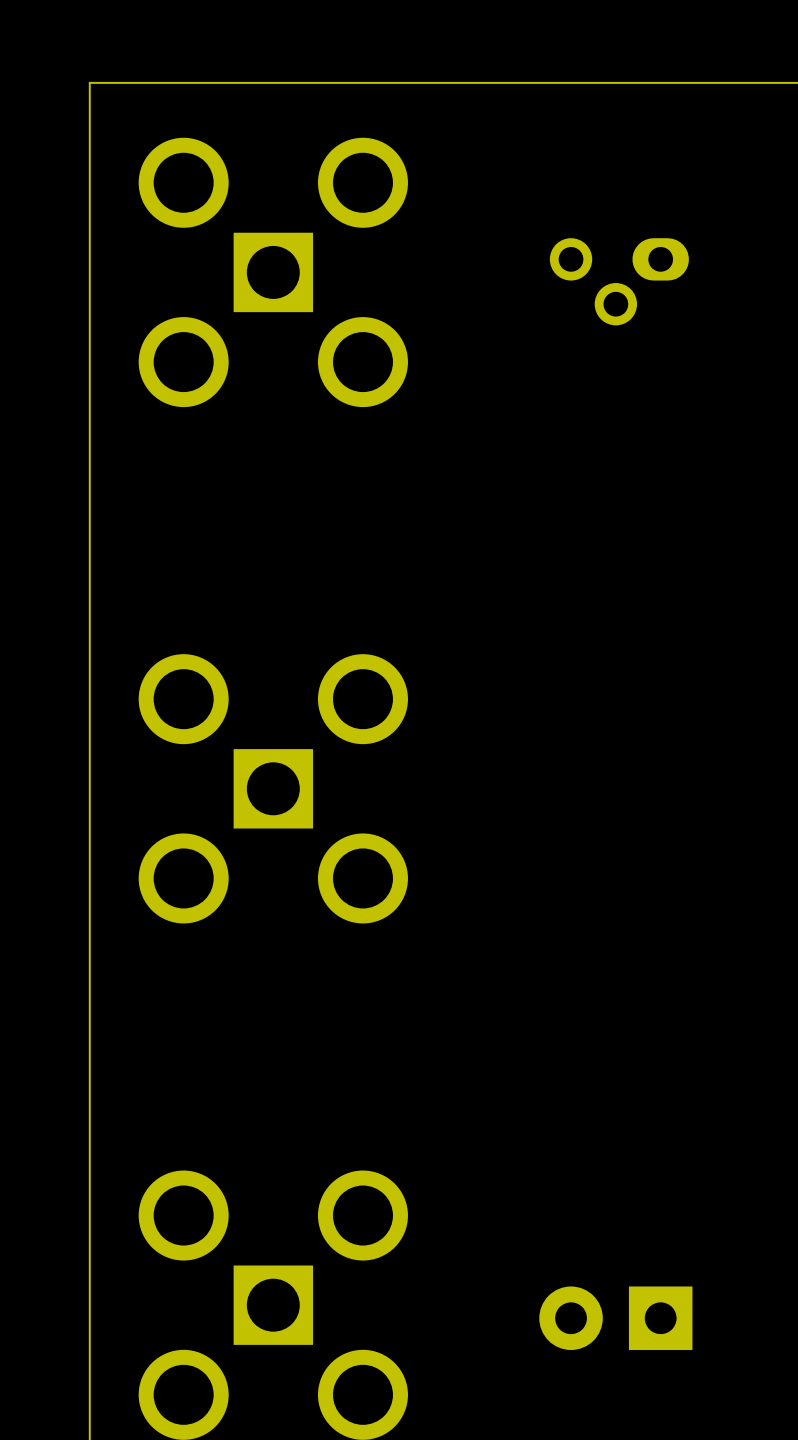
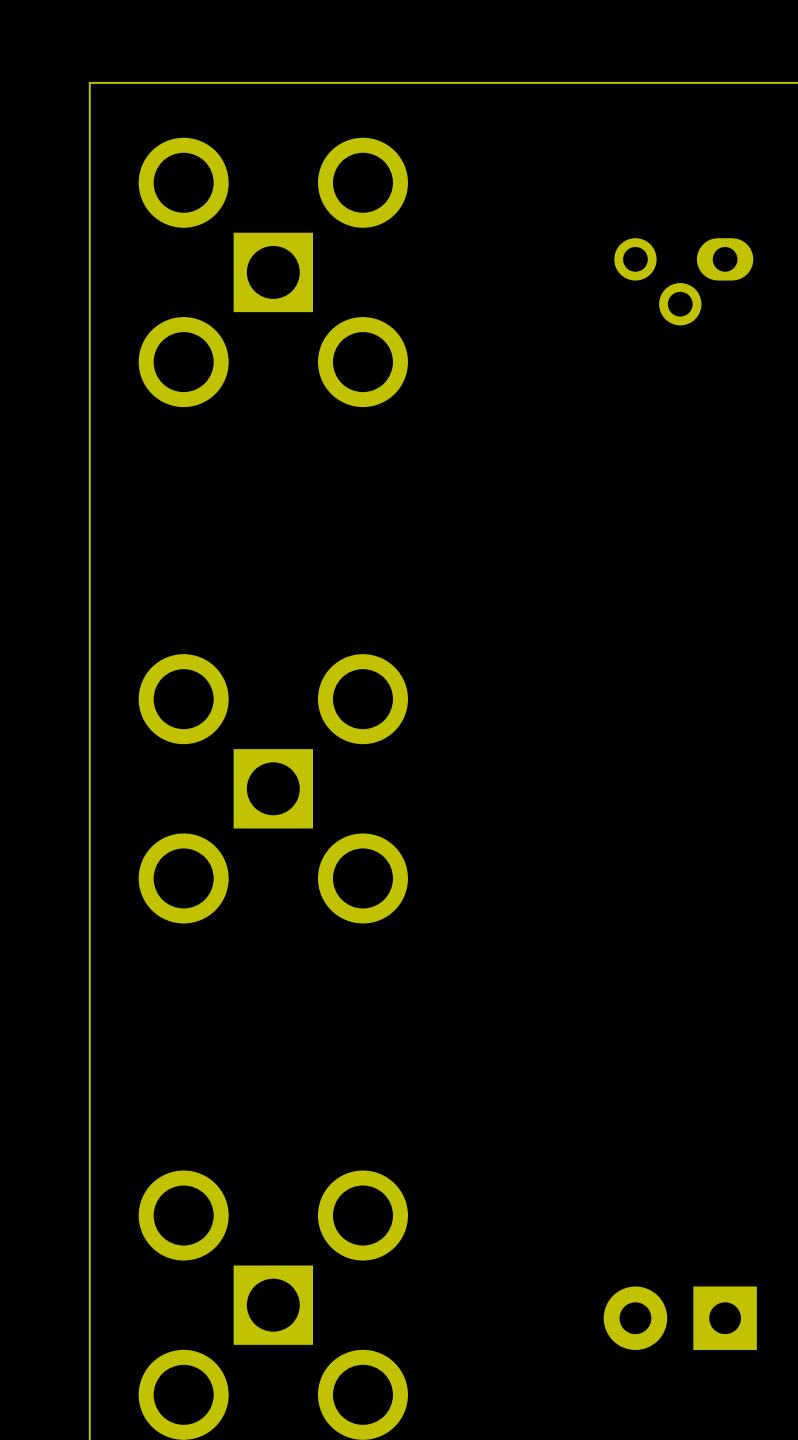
part position: (619, 281) -> (683, 281)
part position: (615, 1318) -> (680, 1318)

